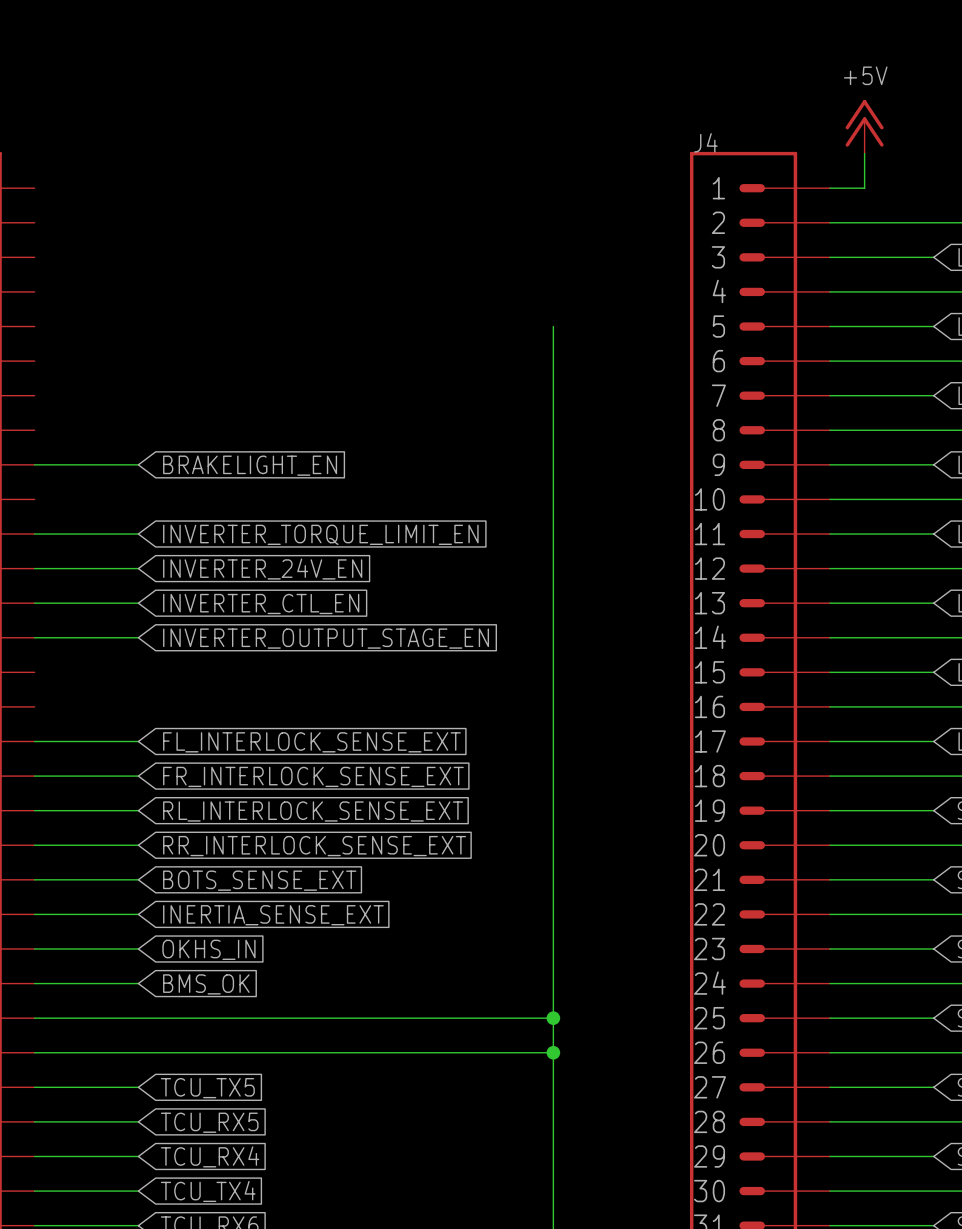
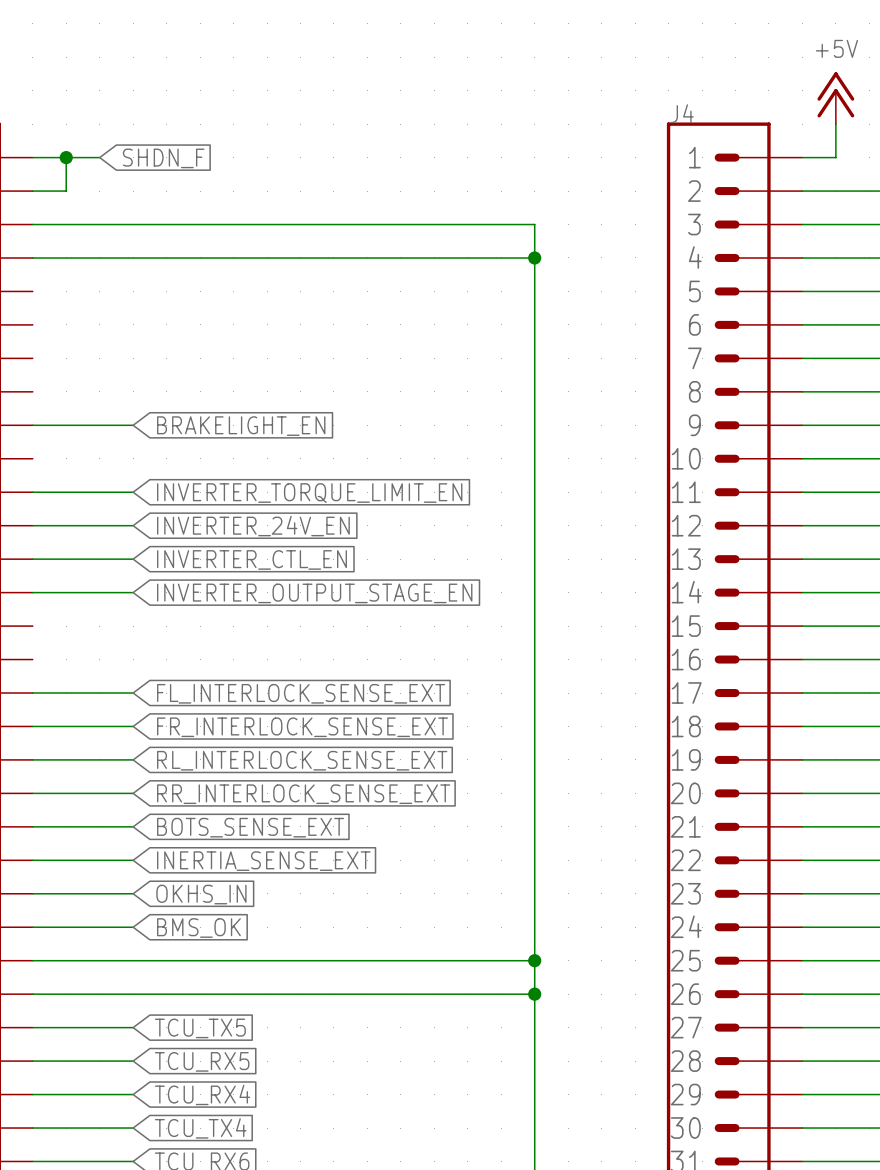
wire: none -> (32, 157) (99, 157)
wire: none -> (66, 157) (66, 191) (32, 191)
junction: none -> (66, 157)
global label: none -> SHDN_F (163, 158)
wire: none -> (32, 224) (534, 224) (534, 291)
wire: none -> (32, 257) (534, 257)
junction: none -> (534, 257)

